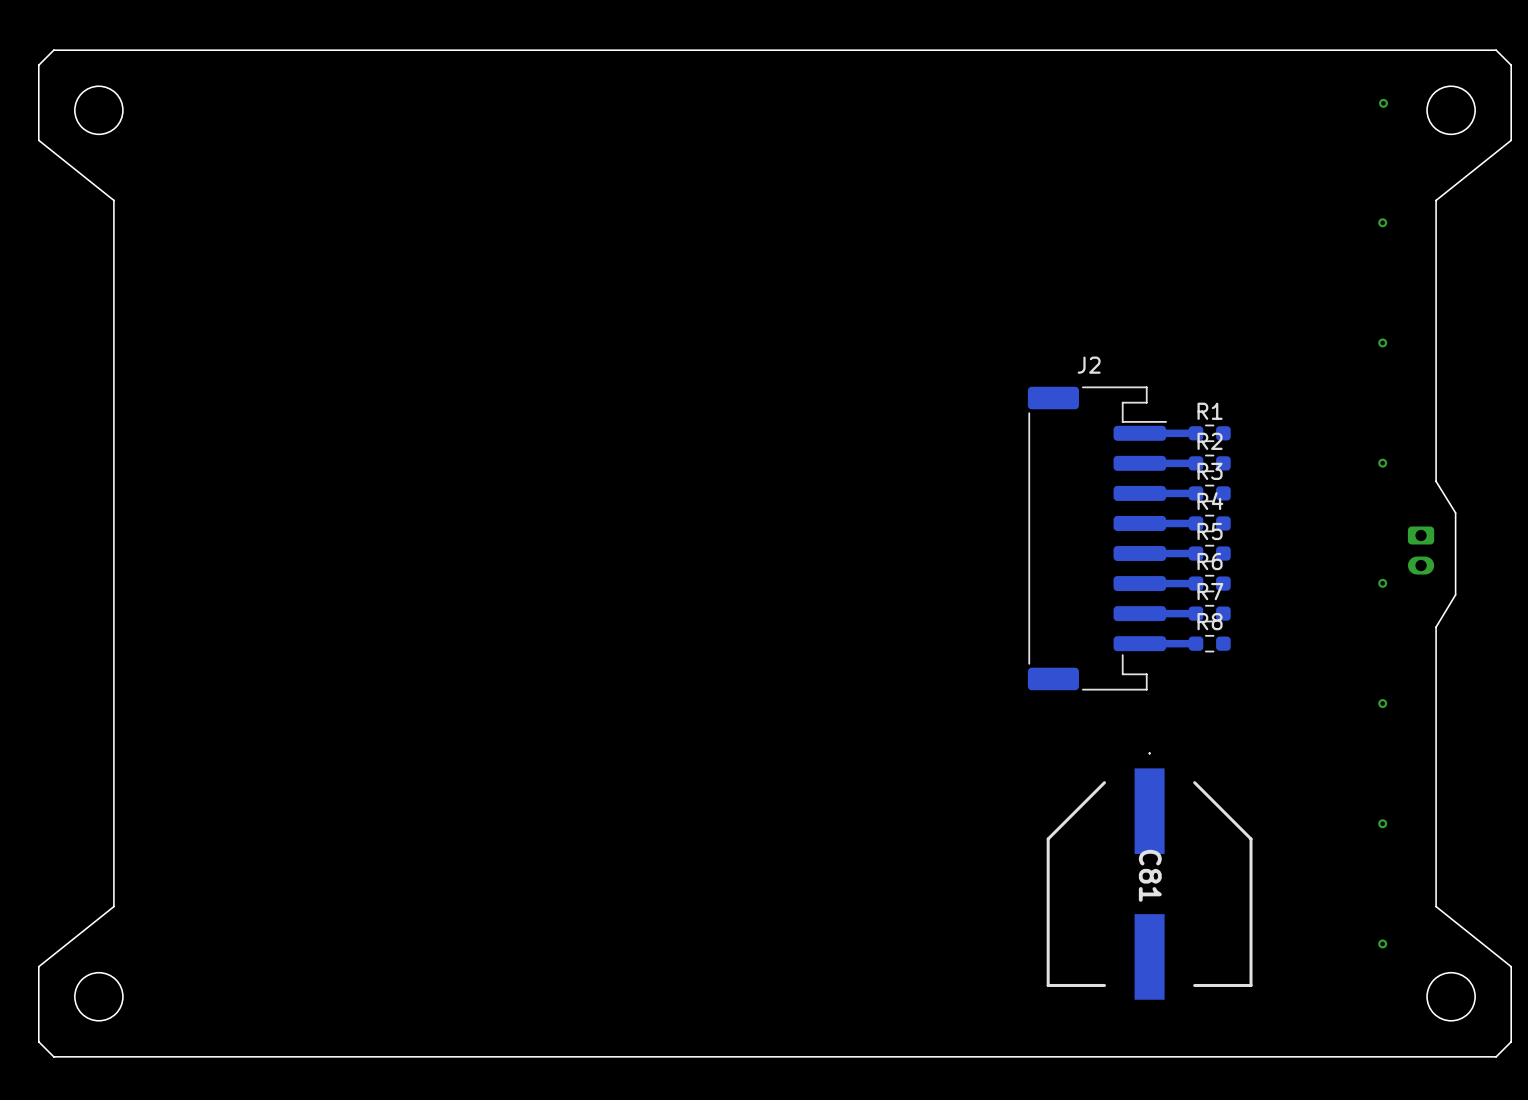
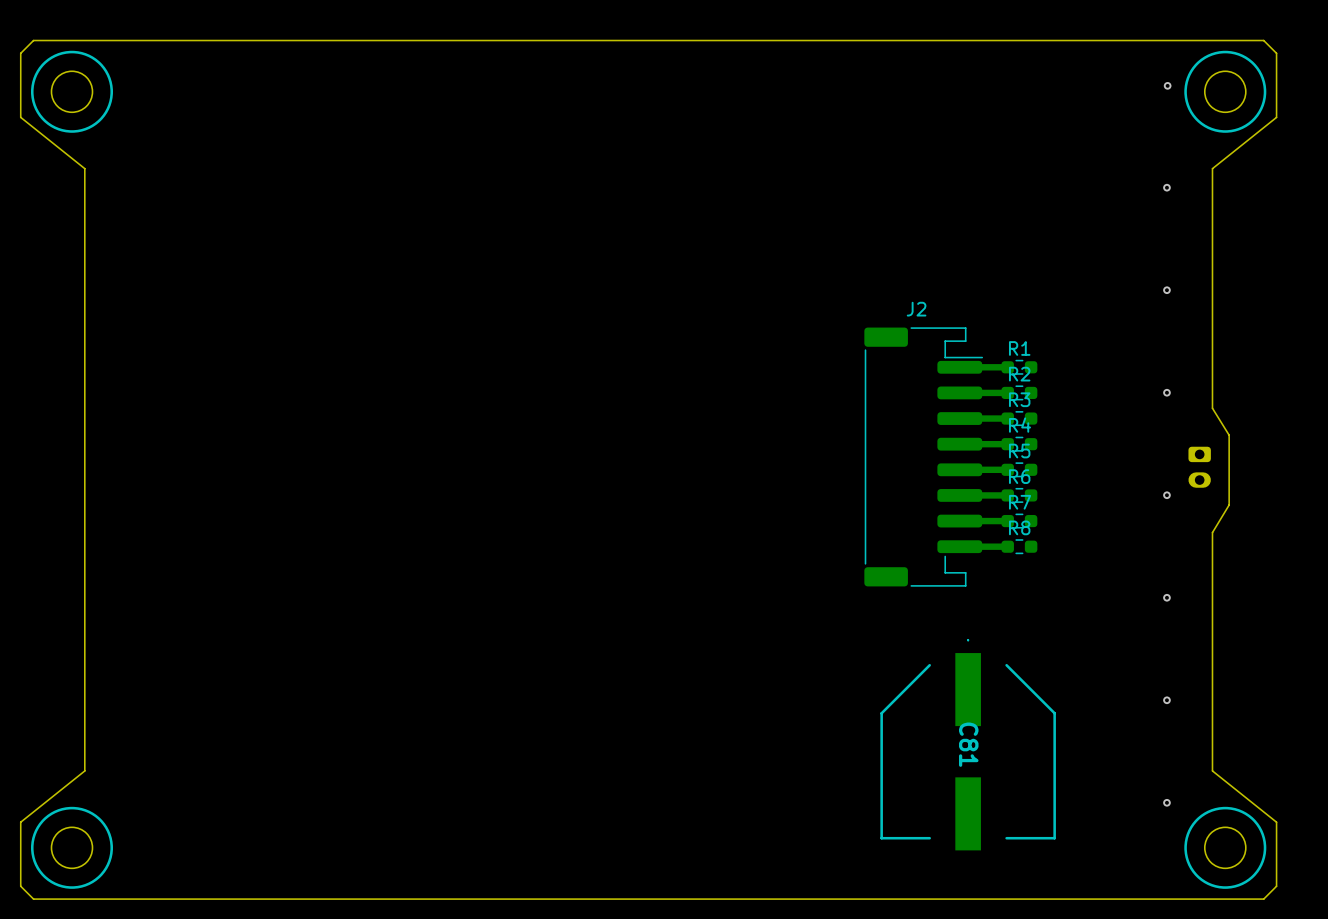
drawing: none -> [30, 50, 114, 133]
drawing: none -> [1184, 50, 1267, 133]
drawing: none -> [30, 806, 114, 889]
drawing: none -> [1184, 806, 1267, 889]

